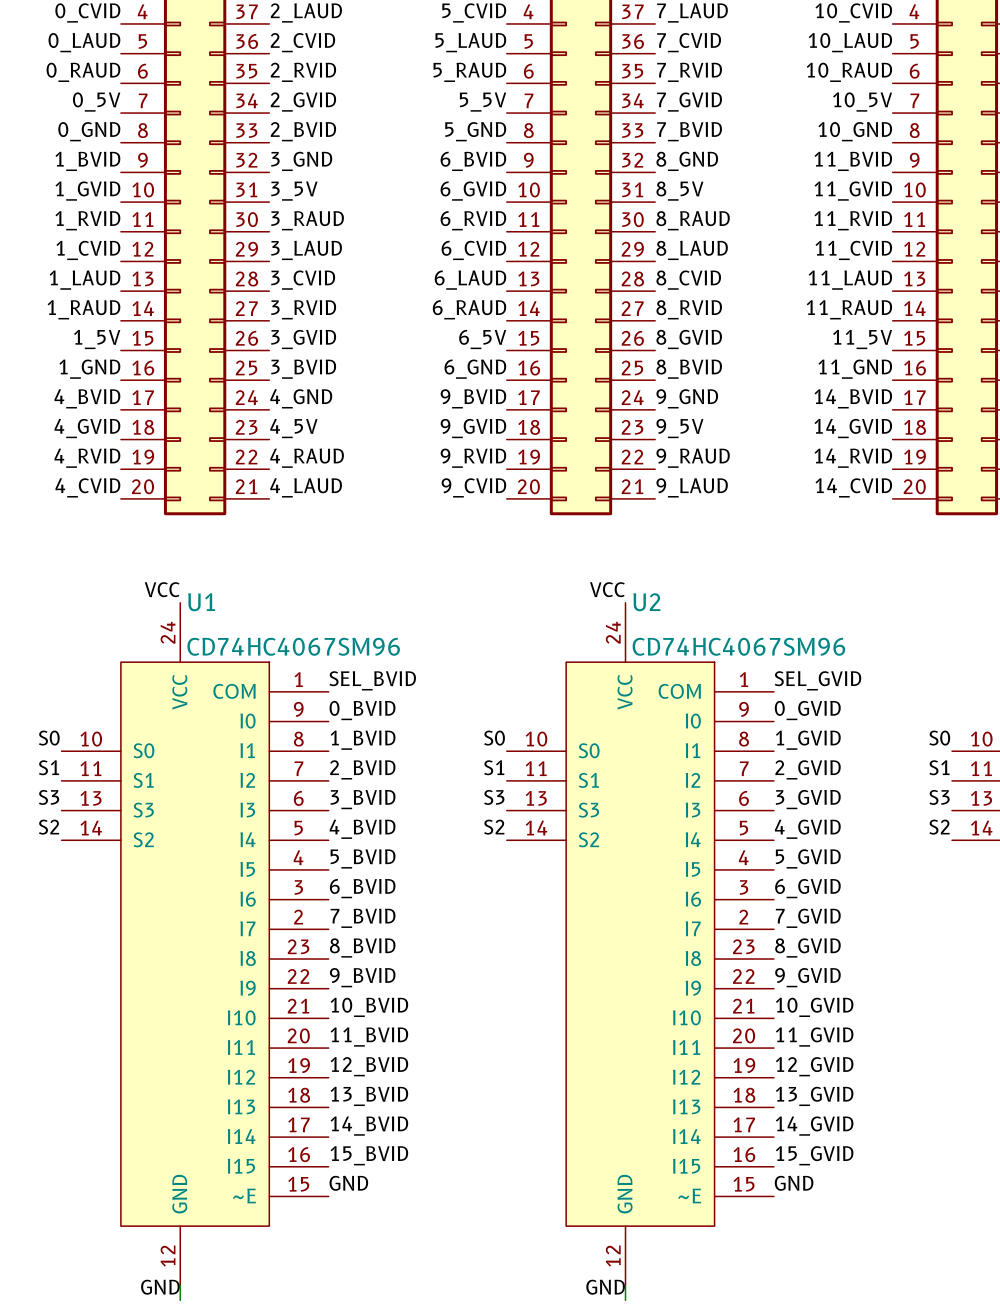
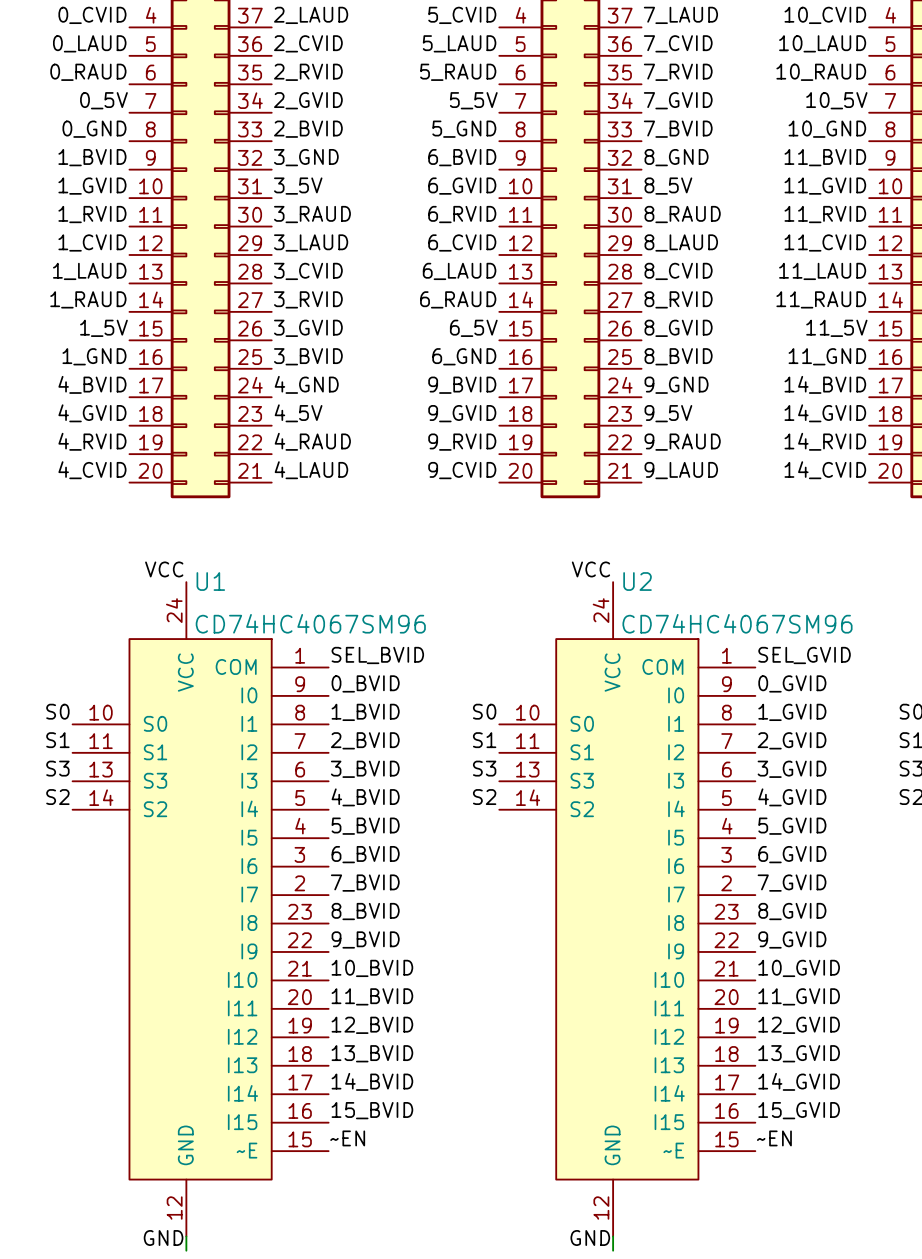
label: GND (348, 1183) -> ~EN (347, 1138)
label: GND (794, 1183) -> ~EN (774, 1138)

